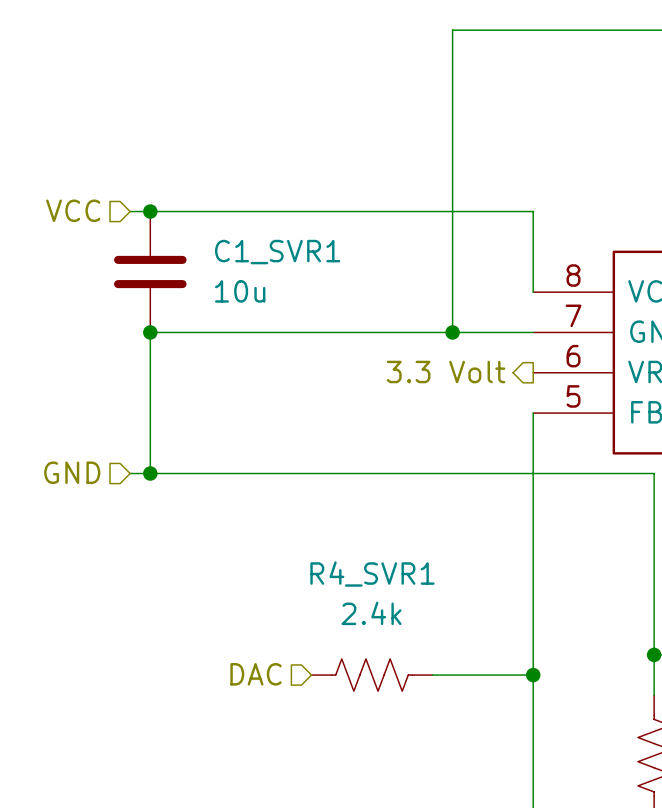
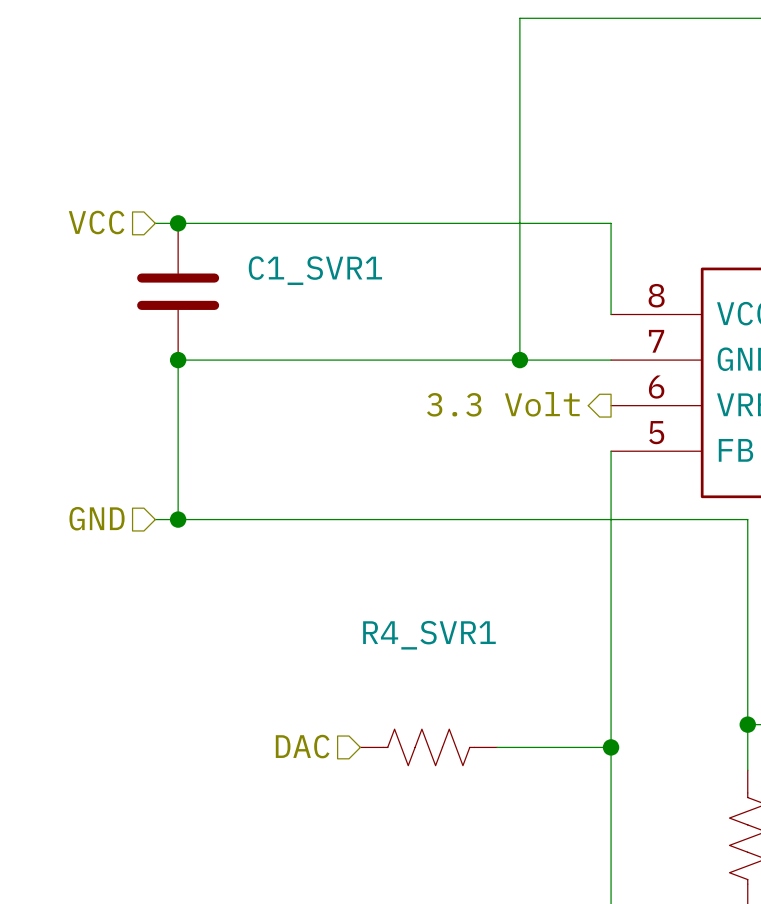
C1_SVR1 value: 10u (240, 291) -> none
R4_SVR1 value: 2.4k (371, 613) -> none

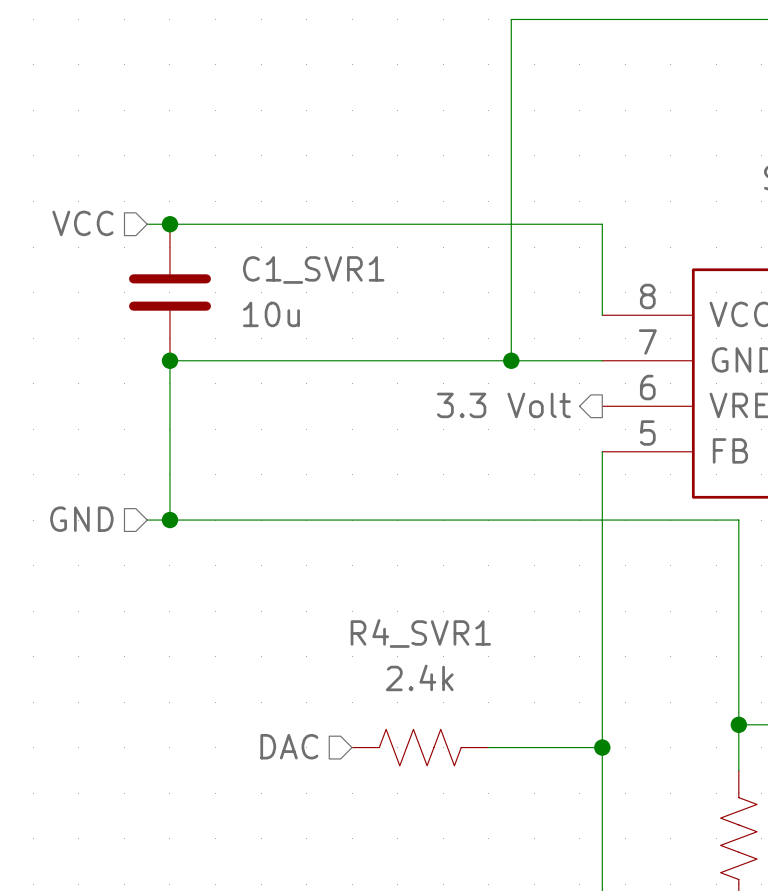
C1_SVR1 value: none -> 10u (271, 314)
R4_SVR1 value: none -> 2.4k (419, 677)

